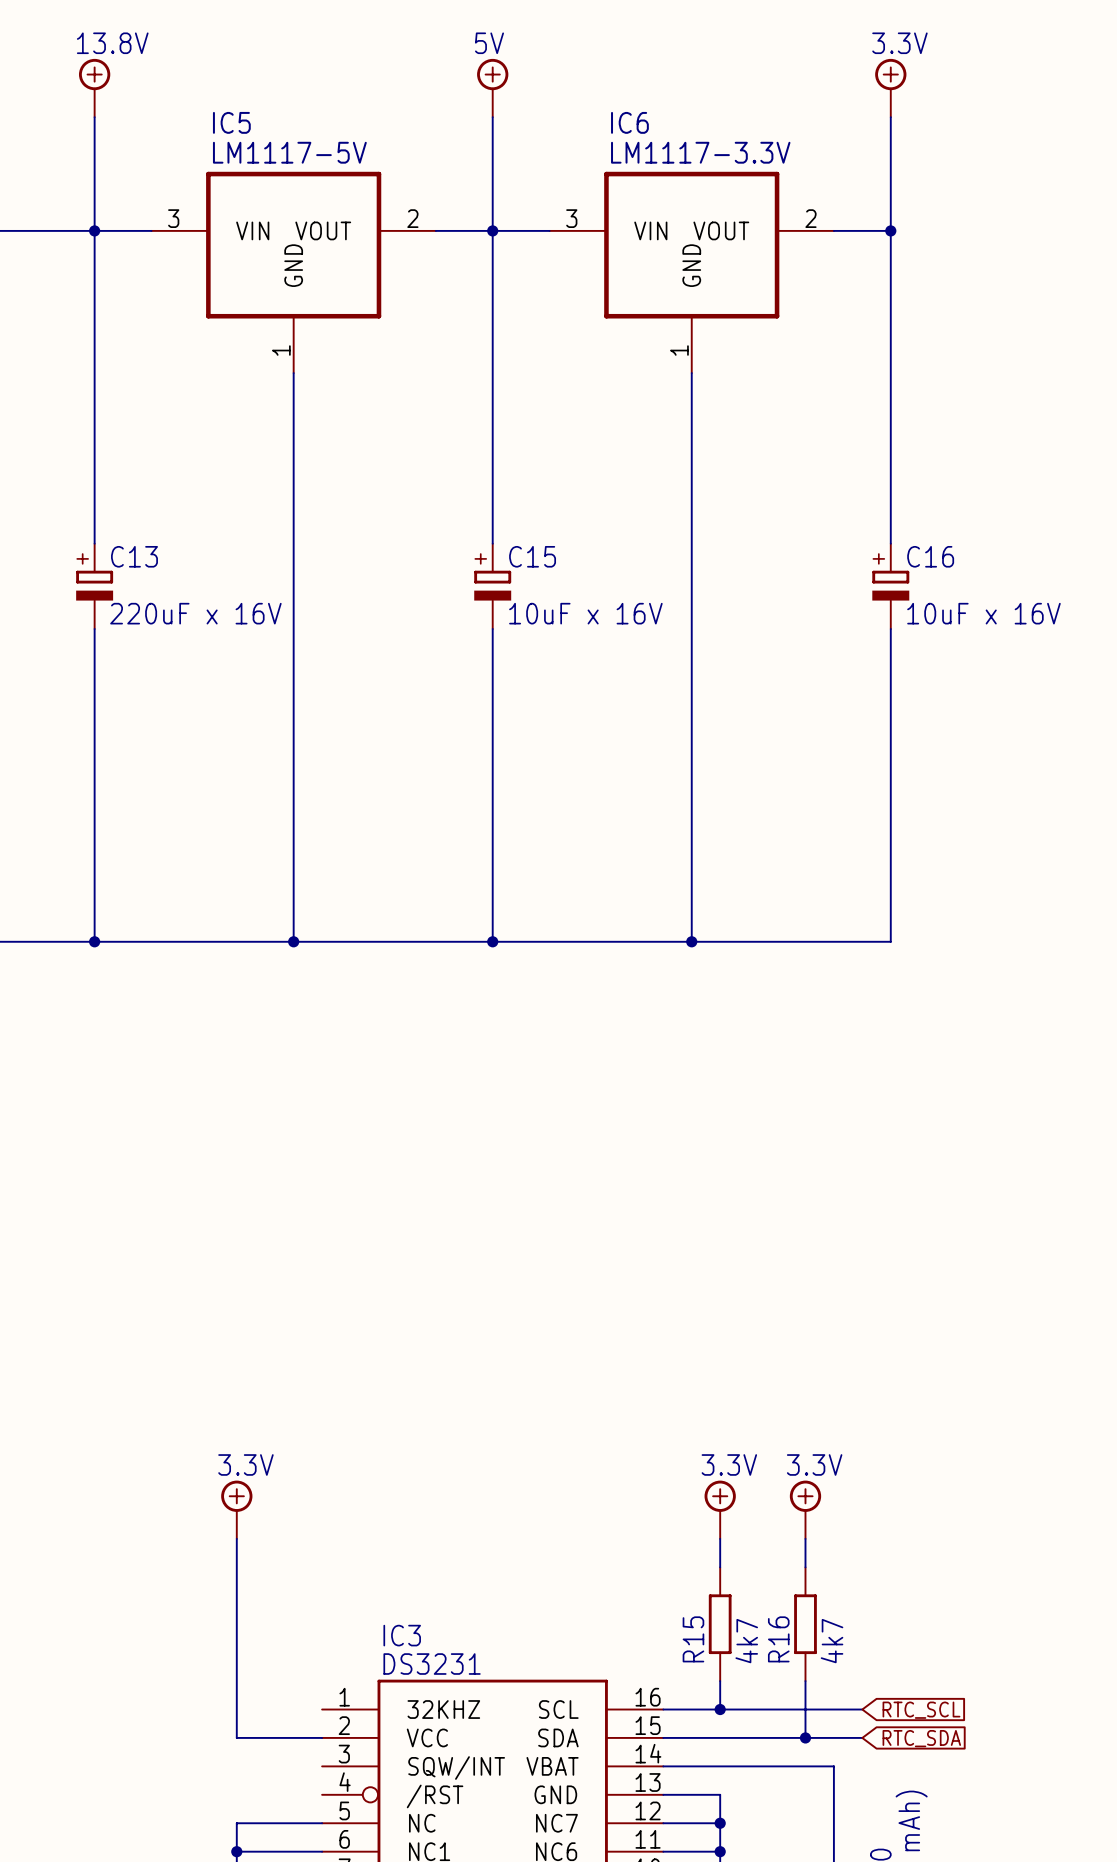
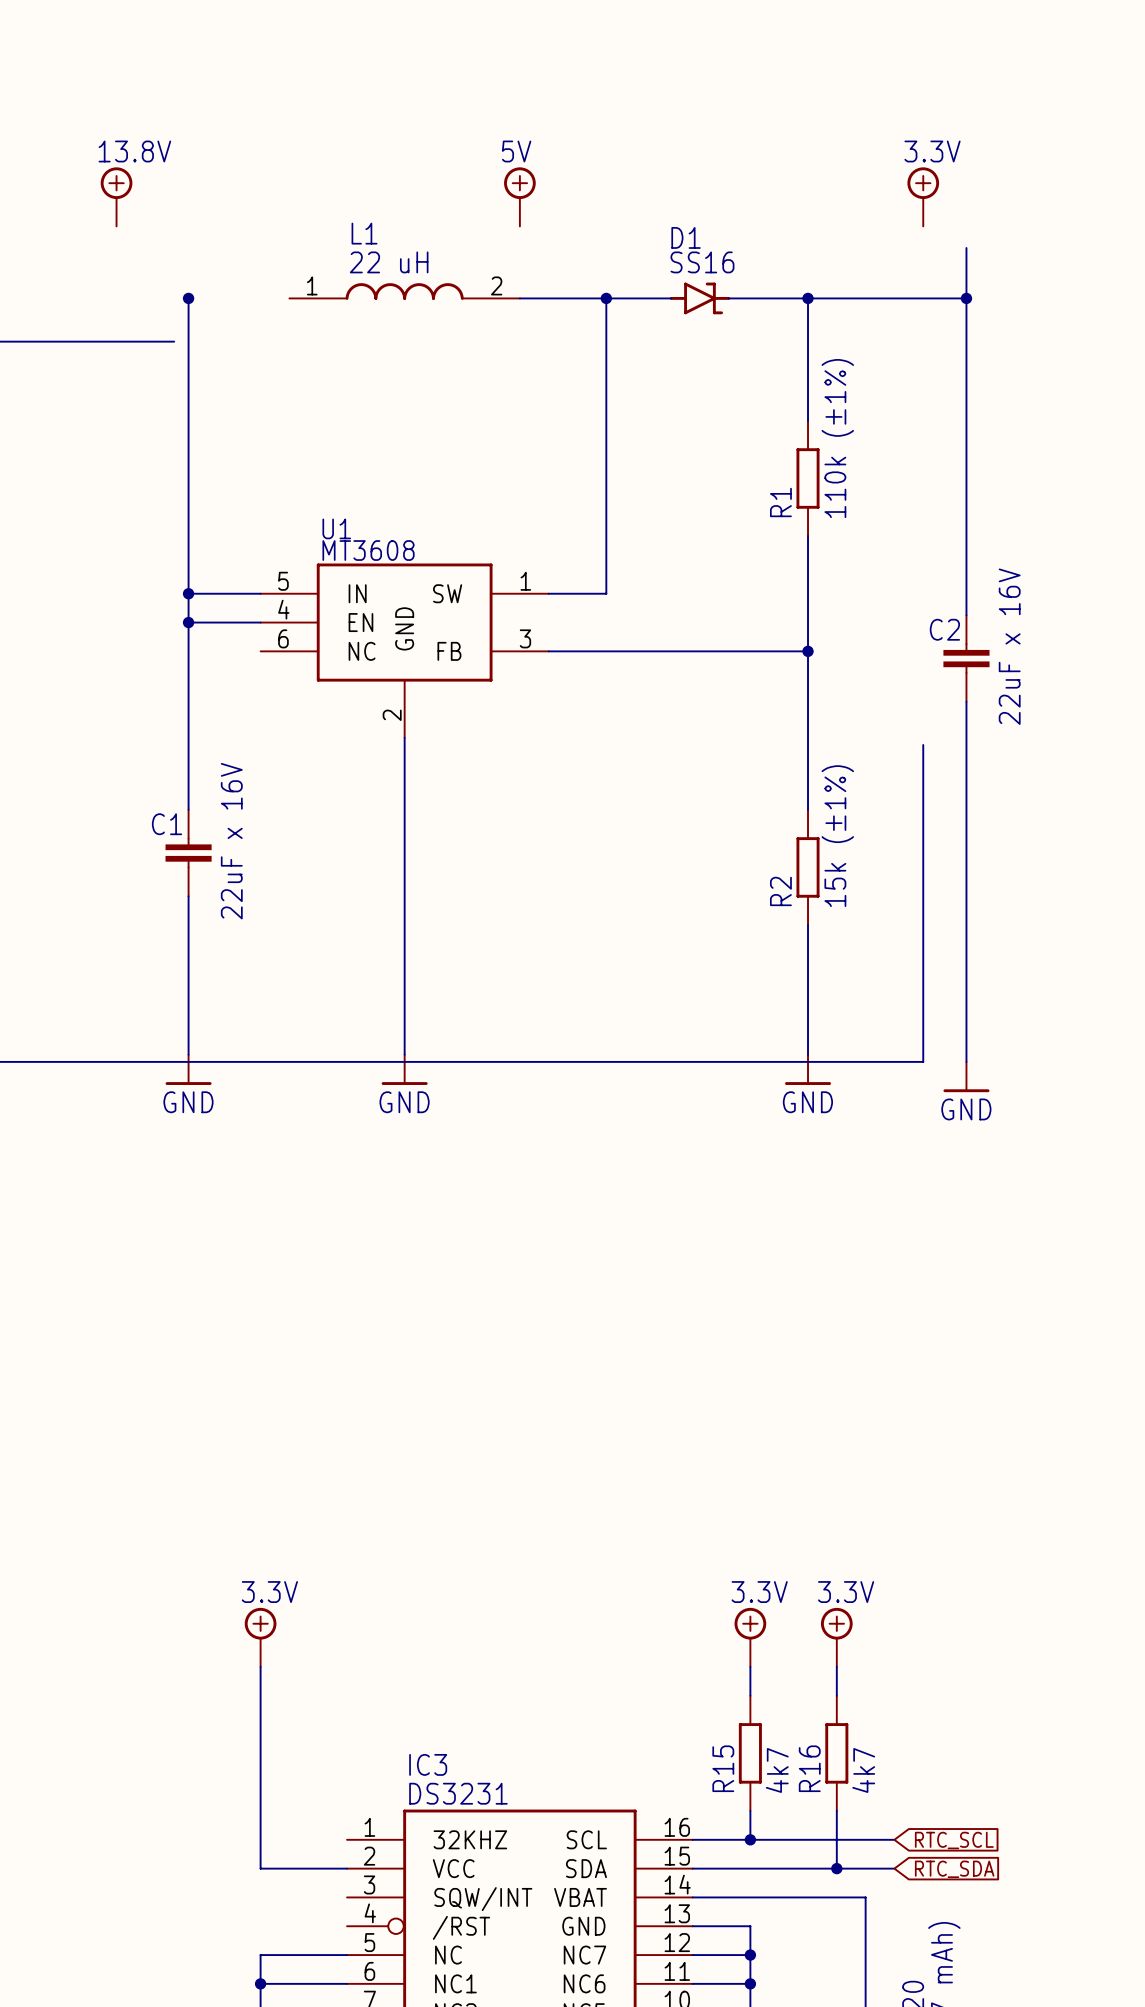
wire: (94, 117) (94, 543) -> none
wire: (492, 117) (492, 543) -> none
wire: (890, 117) (890, 543) -> none
wire: none -> (966, 248) (966, 615)
L1: none -> 22 uH (404, 291)
wire: none -> (188, 298) (188, 809)
junction: none -> (188, 298)
wire: none -> (519, 298) (671, 298)
wire: none -> (606, 298) (606, 593) (548, 593)
junction: none -> (606, 298)
D1: none -> SS16 (699, 298)
wire: none -> (728, 298) (966, 298)
junction: none -> (808, 298)
junction: (94, 230) -> none
wire: (435, 230) (549, 230) -> none
junction: (492, 230) -> none
wire: (833, 230) (890, 230) -> none
junction position: (890, 230) -> (966, 298)
IC5: LM1117-5V (293, 272) -> none
IC6: LM1117-3.3V (691, 272) -> none
R1: none -> 110k (±1%) (808, 478)
wire: (293, 373) (293, 941) -> none
wire: (691, 373) (691, 941) -> none
wire: none -> (808, 536) (808, 809)
wire: none -> (188, 593) (260, 593)
junction: none -> (188, 593)
wire: none -> (188, 622) (260, 622)
junction: none -> (188, 622)
U1: none -> MT3608 (404, 650)
wire: none -> (548, 651) (808, 651)
junction: none -> (808, 651)
C2: none -> 22uF x 16V (966, 658)
C13: 220uF x 16V (94, 586) -> none
C15: 10uF x 16V (492, 586) -> none
C16: 10uF x 16V (890, 586) -> none
wire: none -> (966, 701) (966, 1061)
wire: (94, 629) (94, 941) -> none
wire: (492, 629) (492, 941) -> (404, 737) (404, 1054)
C1: none -> 22uF x 16V (188, 853)
R2: none -> 15k (±1%) (808, 867)
wire: none -> (188, 896) (188, 1054)
wire: none -> (808, 925) (808, 1054)
junction: (94, 941) -> none
junction: (293, 941) -> none
junction: (492, 941) -> none
junction: (691, 941) -> none
power symbol: none -> GND (188, 1069)
power symbol: none -> GND (404, 1069)
power symbol: none -> GND (808, 1069)
power symbol: none -> GND (966, 1077)

